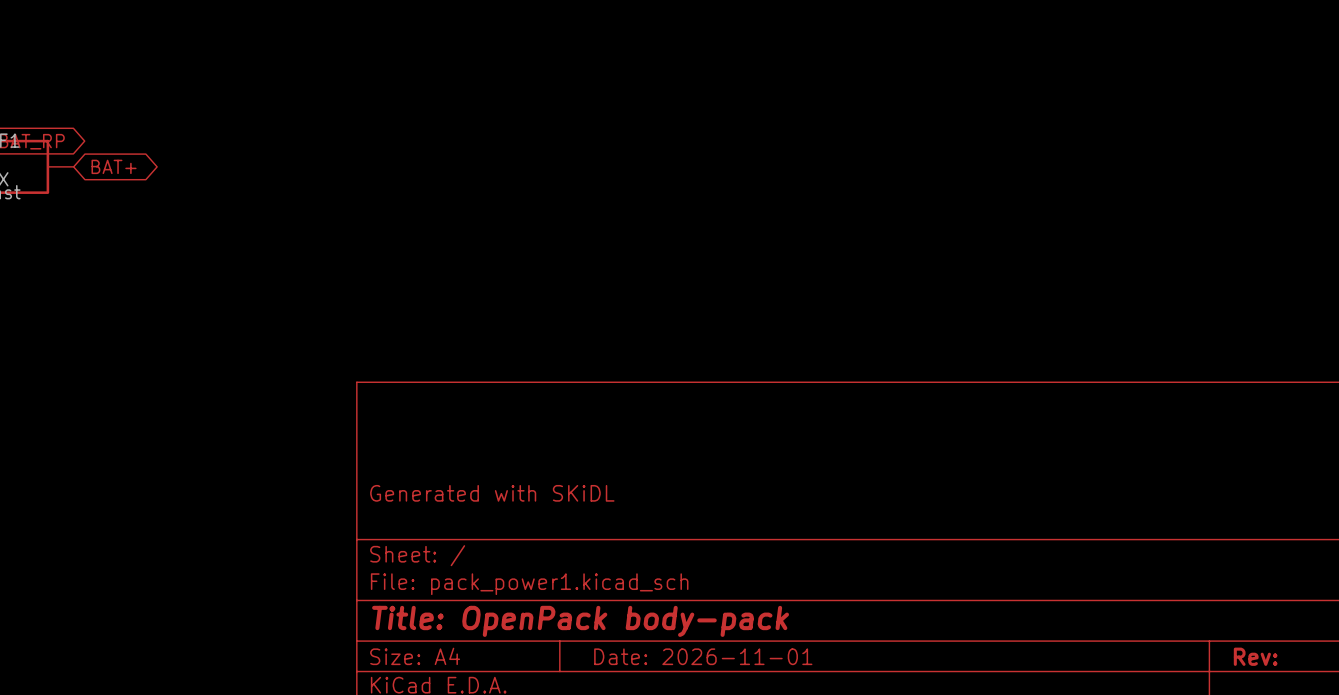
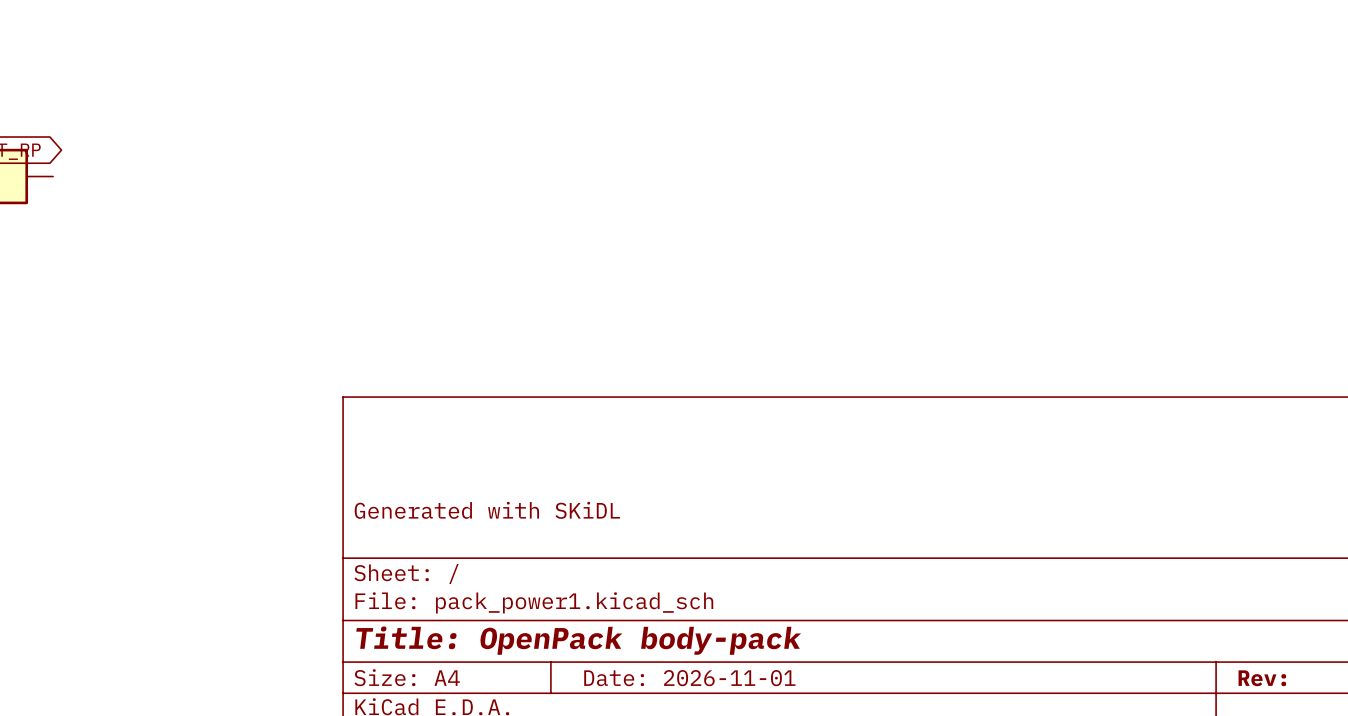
global label: BAT+ (114, 166) -> none

